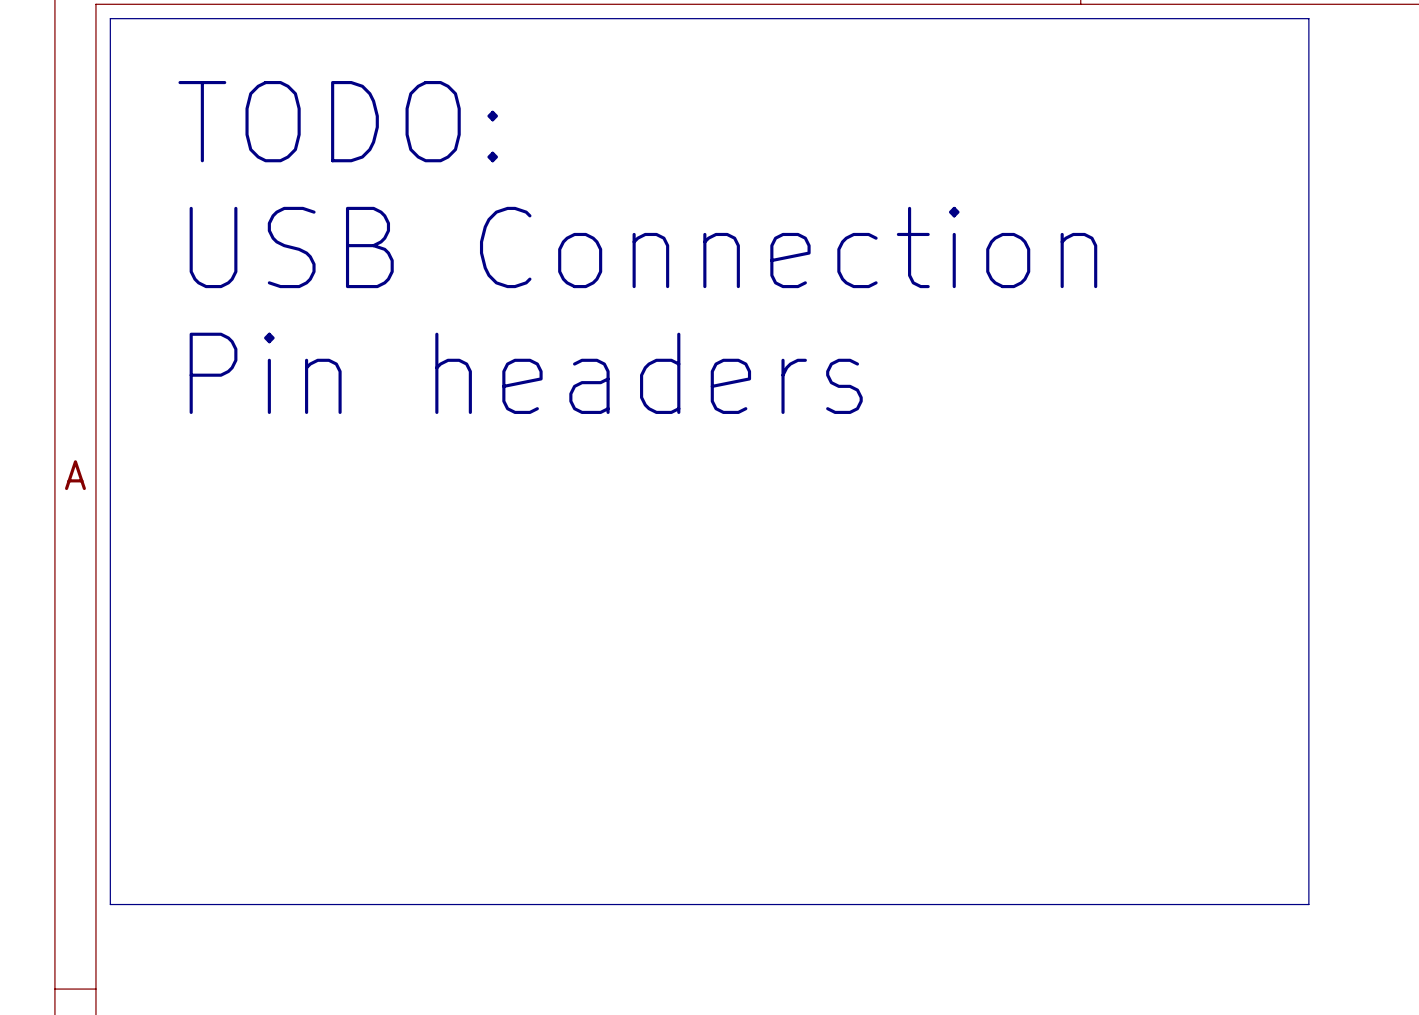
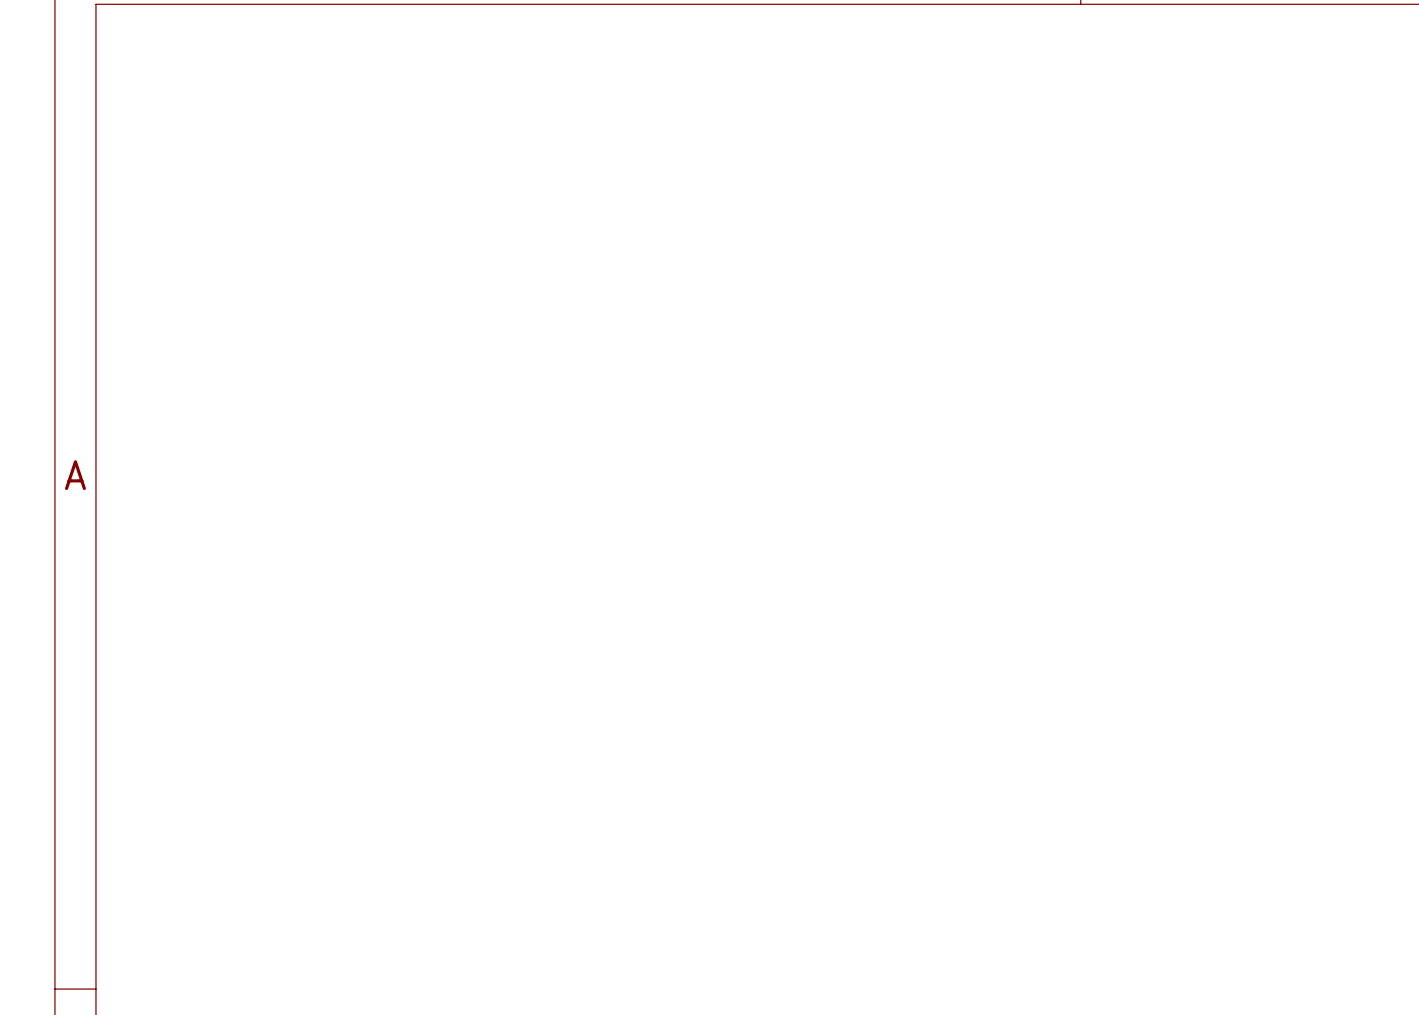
line: (110, 18) (1308, 18) (1308, 904) (110, 904) (110, 18) -> none
text: TODO: (338, 121) -> none
text: USB Connection (643, 247) -> none
text: Pin headers (526, 373) -> none

